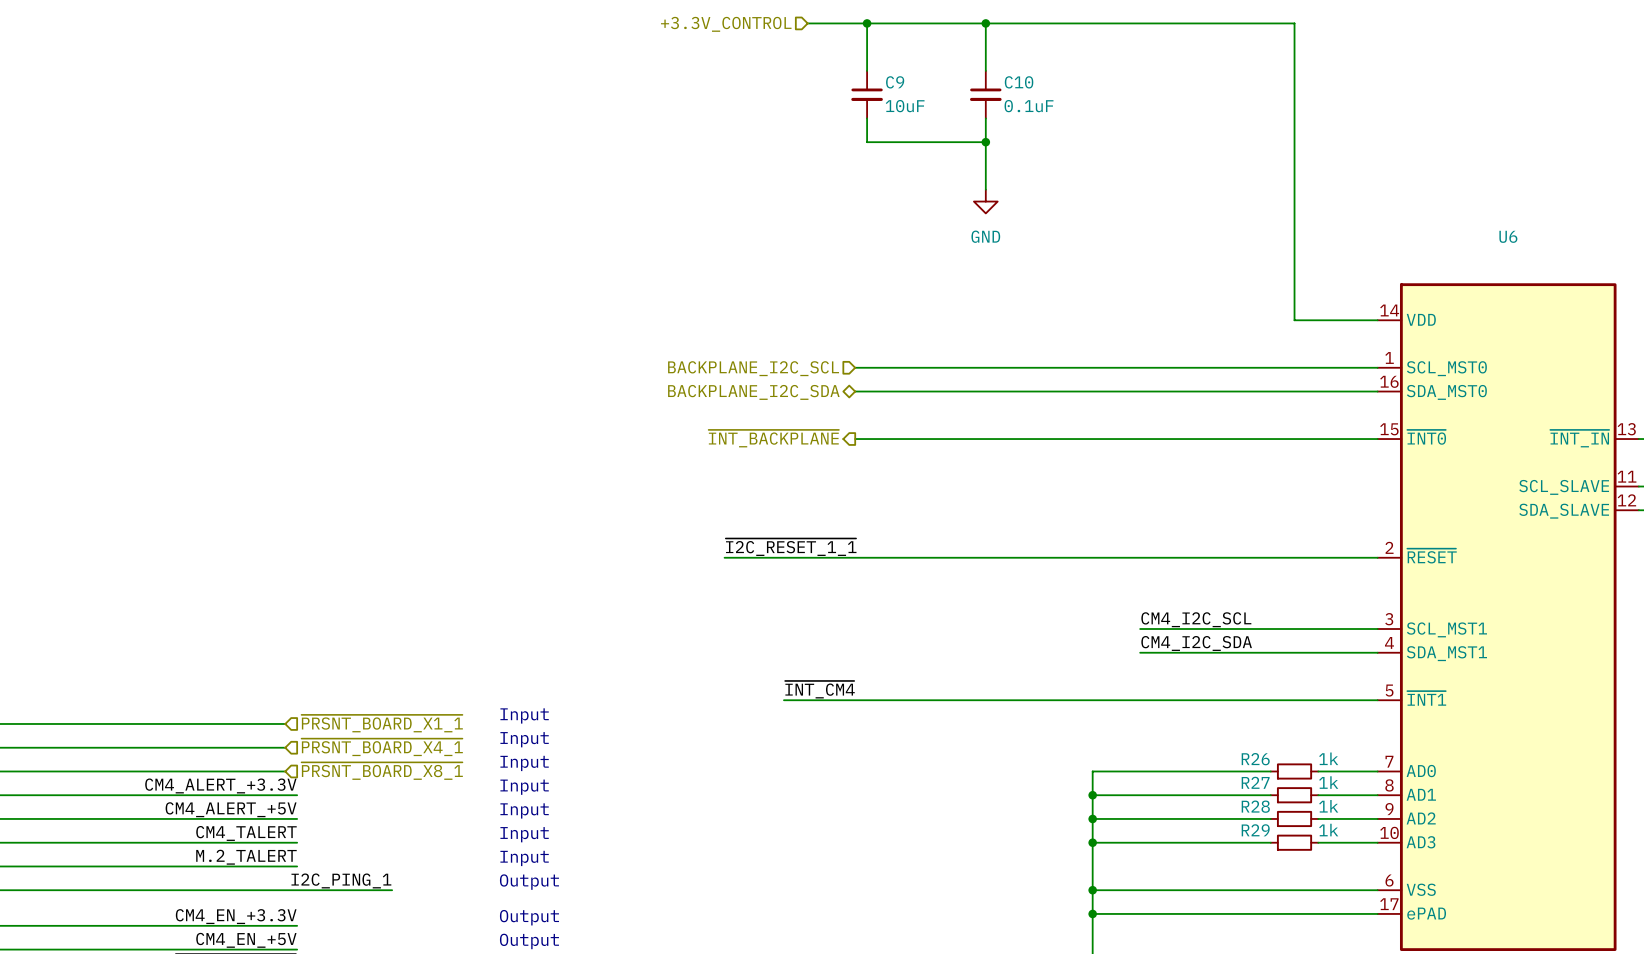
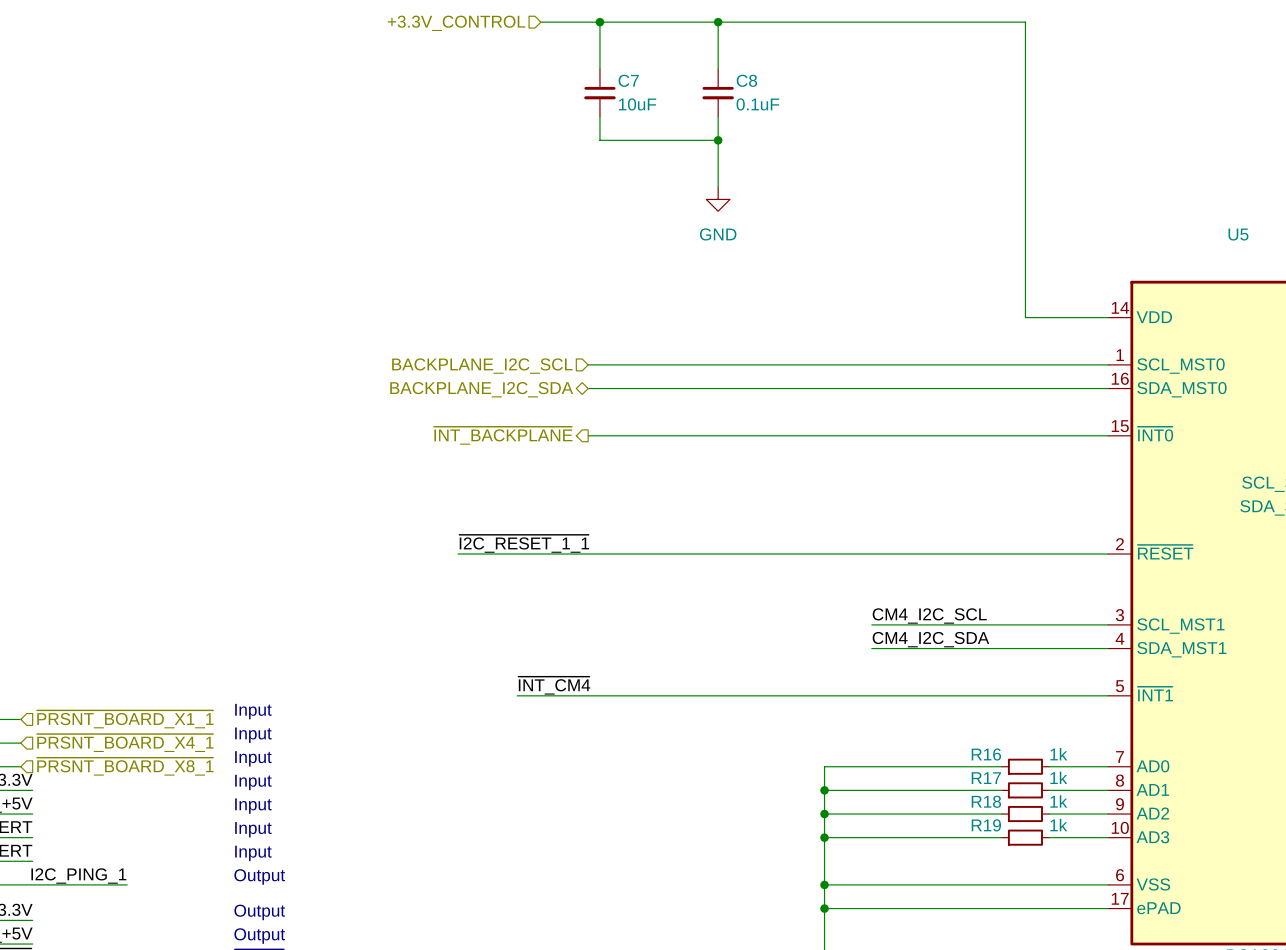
C9 name: C9 (895, 82) -> C7 (628, 80)
C10 name: C10 (1019, 82) -> C8 (746, 80)
U6 name: U6 (1508, 236) -> U5 (1238, 234)
R26 name: R26 (1255, 759) -> R16 (986, 754)
R27 name: R27 (1255, 782) -> R17 (986, 778)
R28 name: R28 (1255, 806) -> R18 (986, 801)
R29 name: R29 (1255, 830) -> R19 (986, 825)

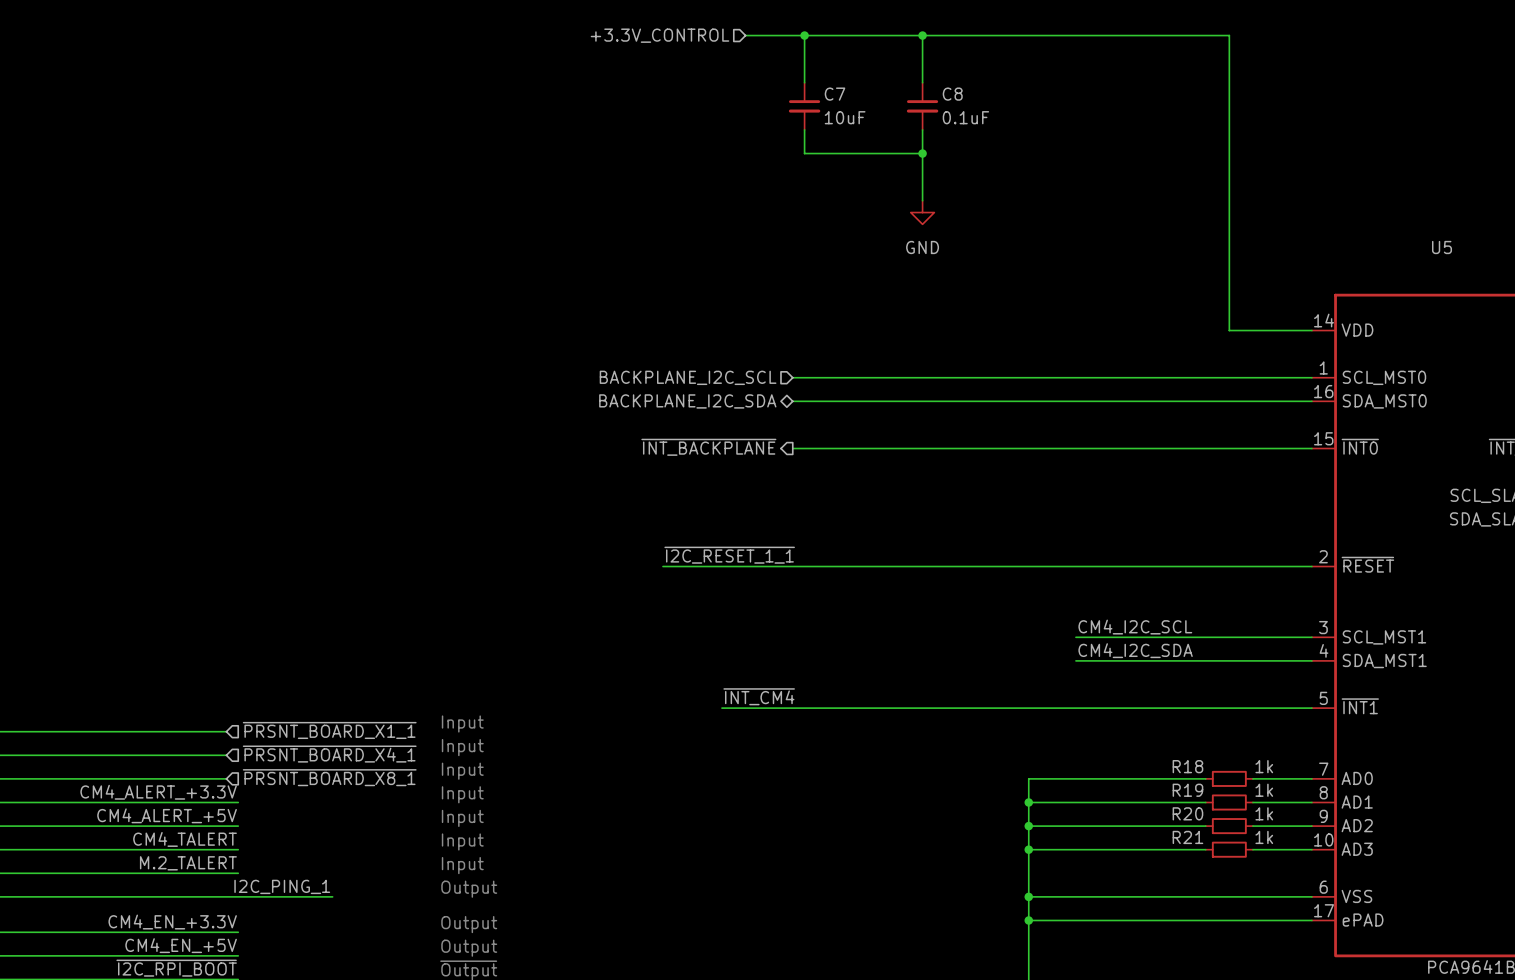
R16 name: R16 (986, 754) -> R18 (1187, 766)
R17 name: R17 (986, 778) -> R19 (1187, 790)
R18 name: R18 (986, 801) -> R20 (1187, 813)
R19 name: R19 (986, 825) -> R21 (1187, 837)

